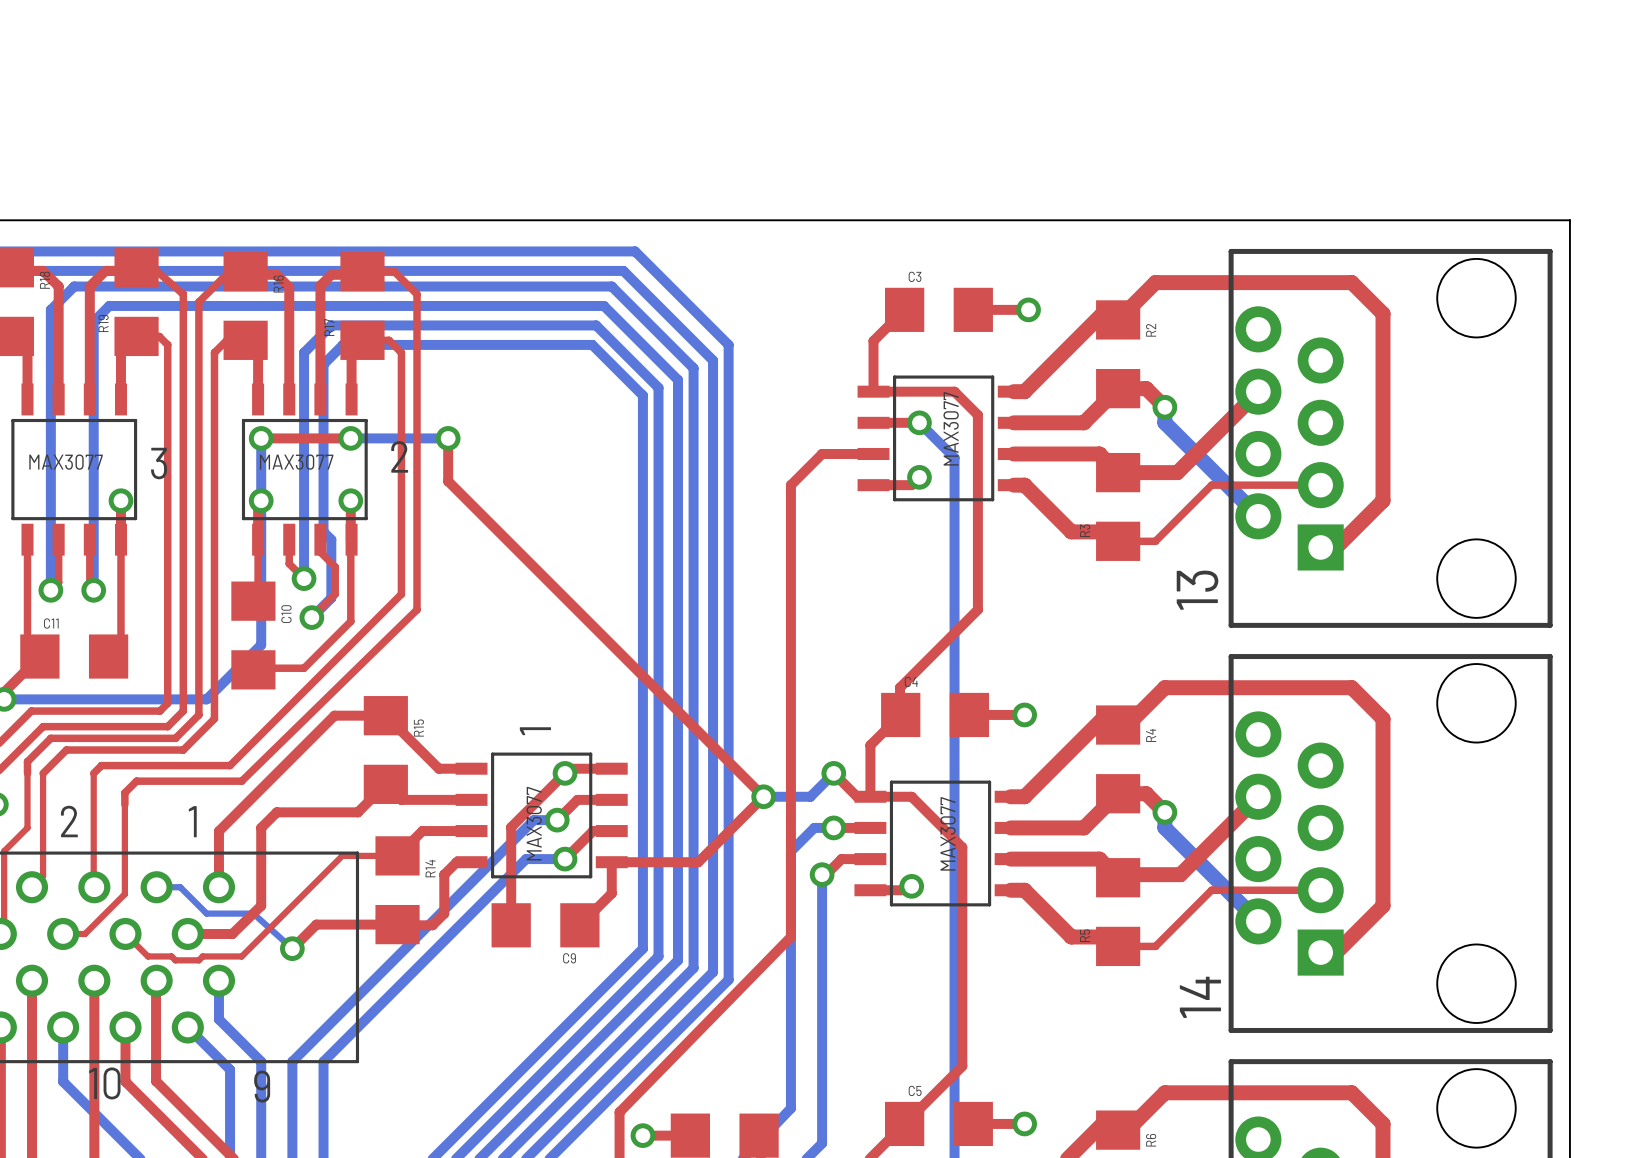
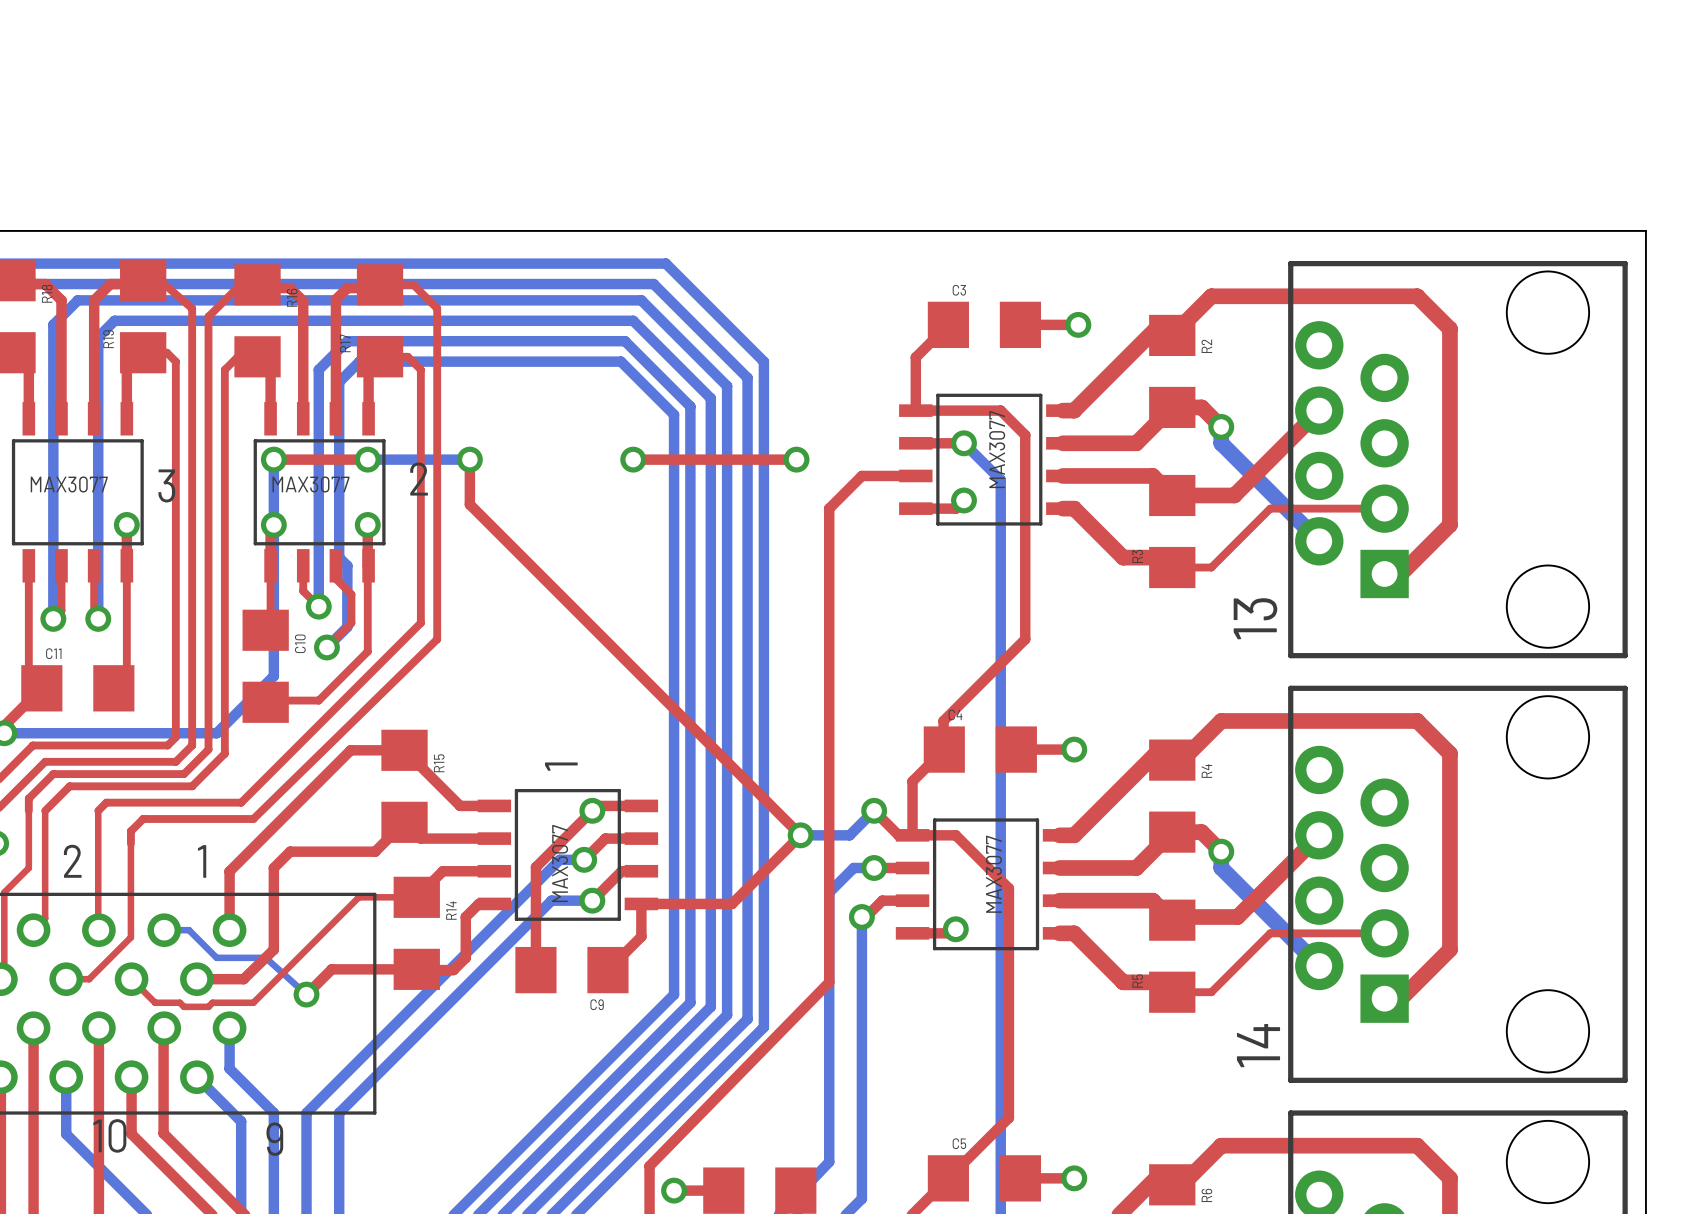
top track: none -> (633, 459) (796, 459)
via: none -> (633, 459)
via: none -> (796, 459)

